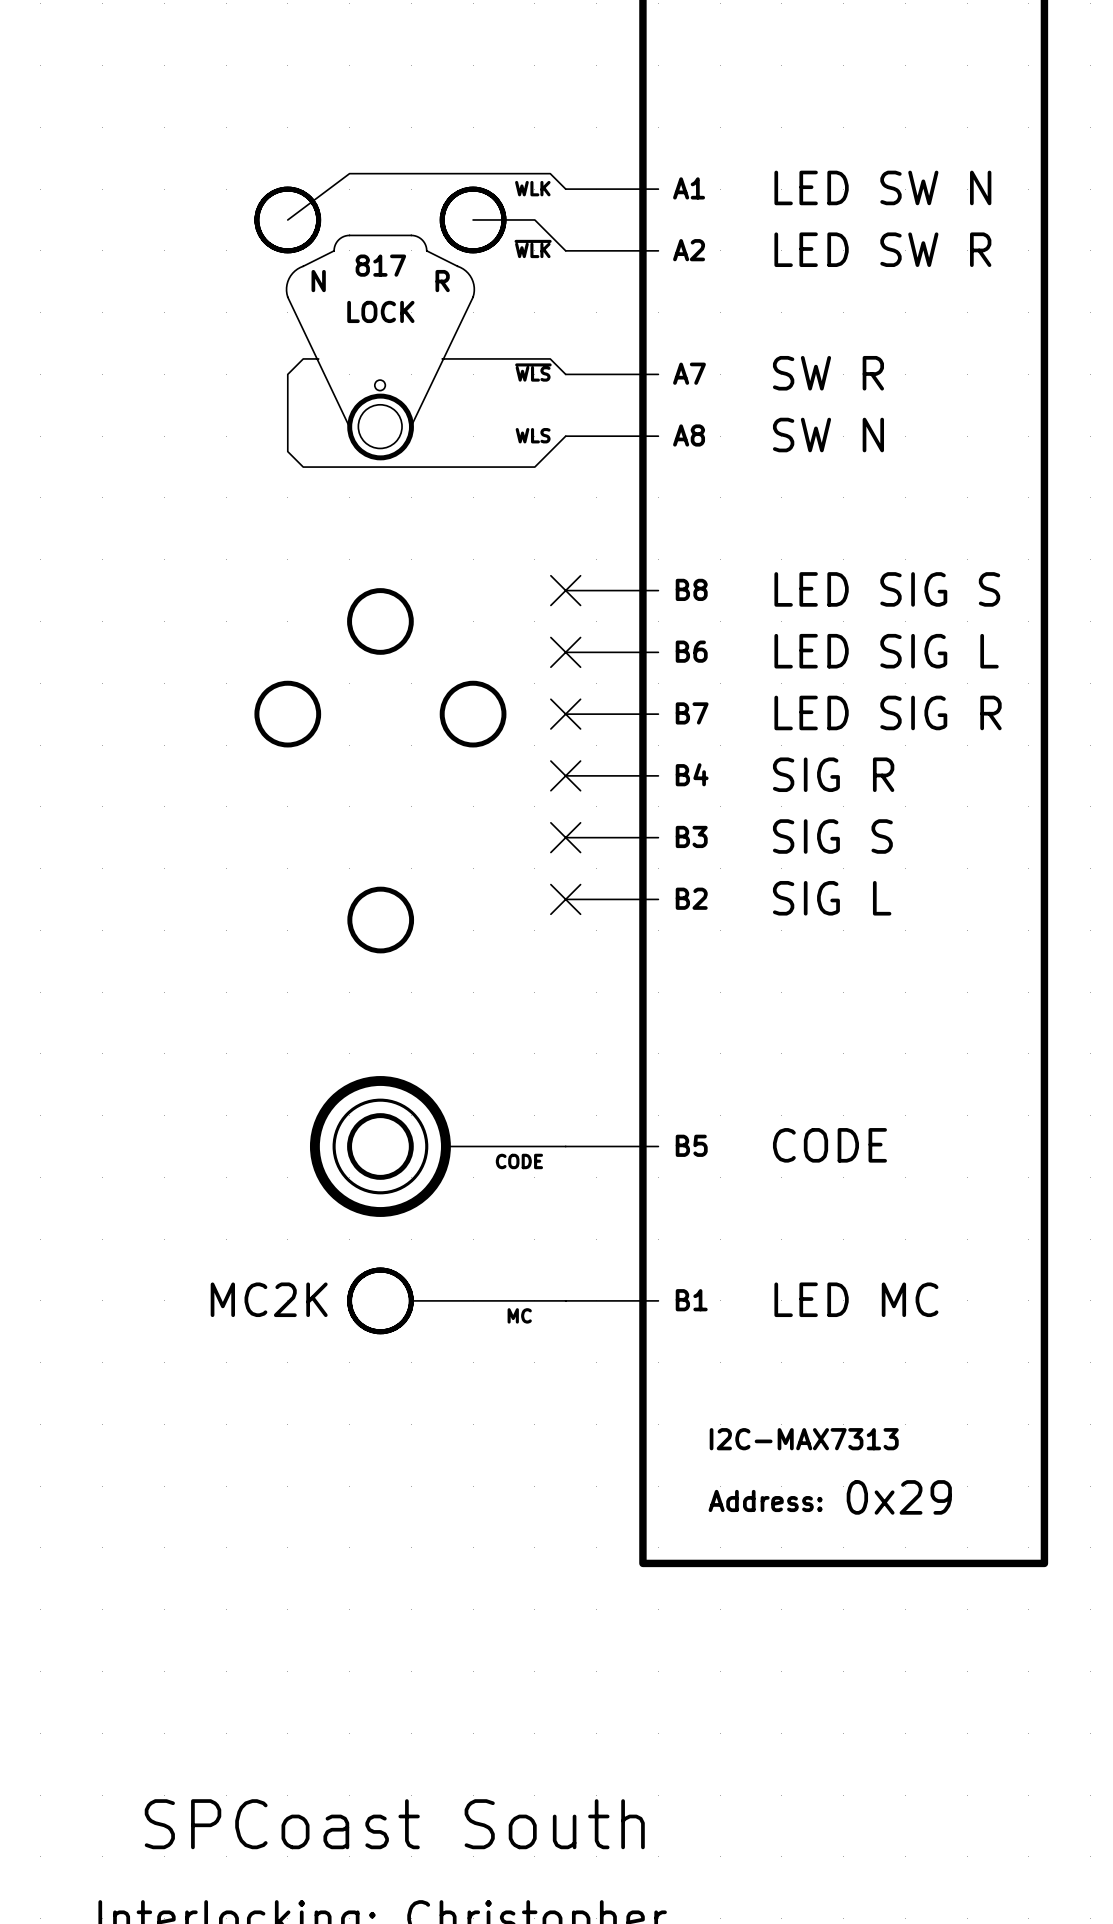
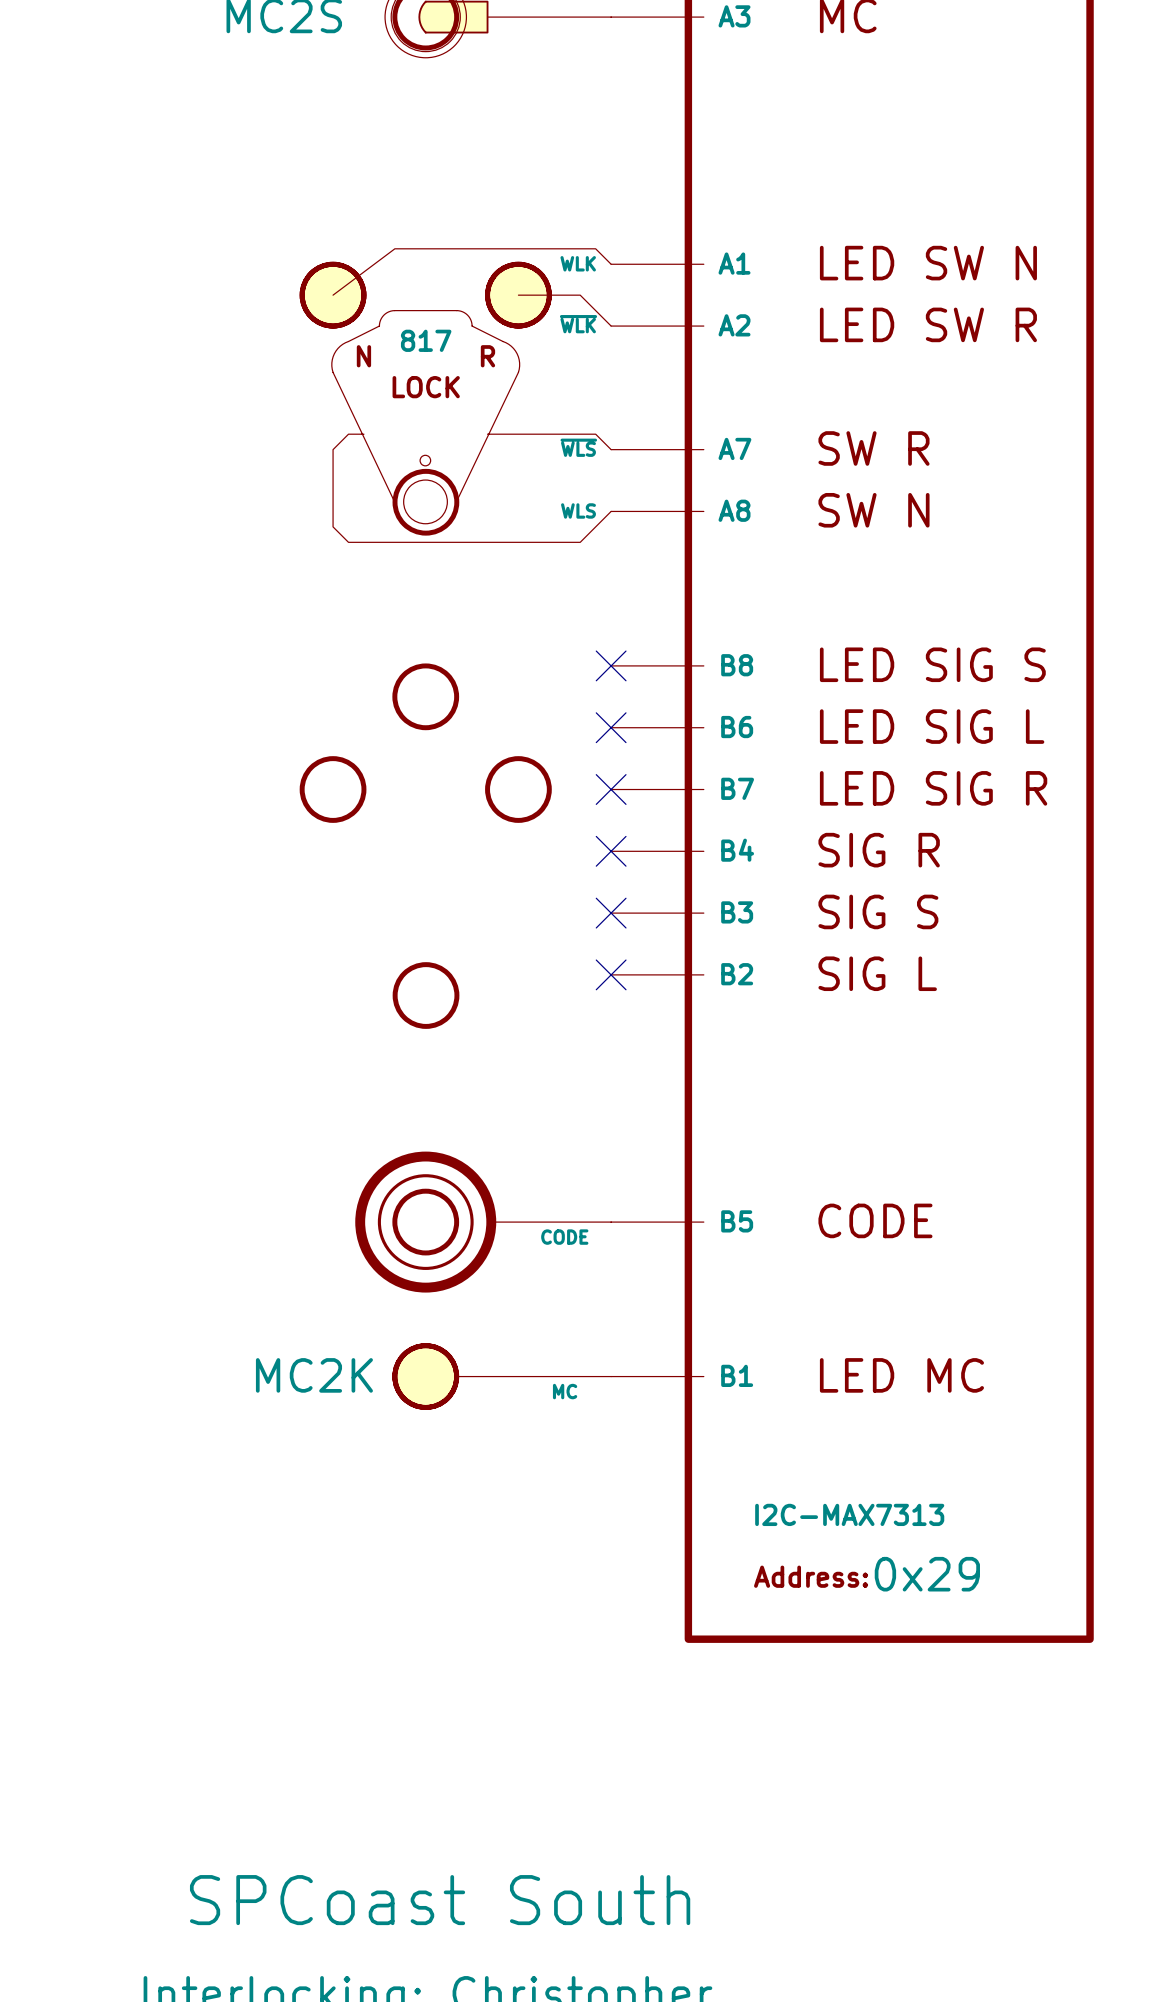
part text position: 0x29 (899, 1497) -> 0x29 (927, 1574)

